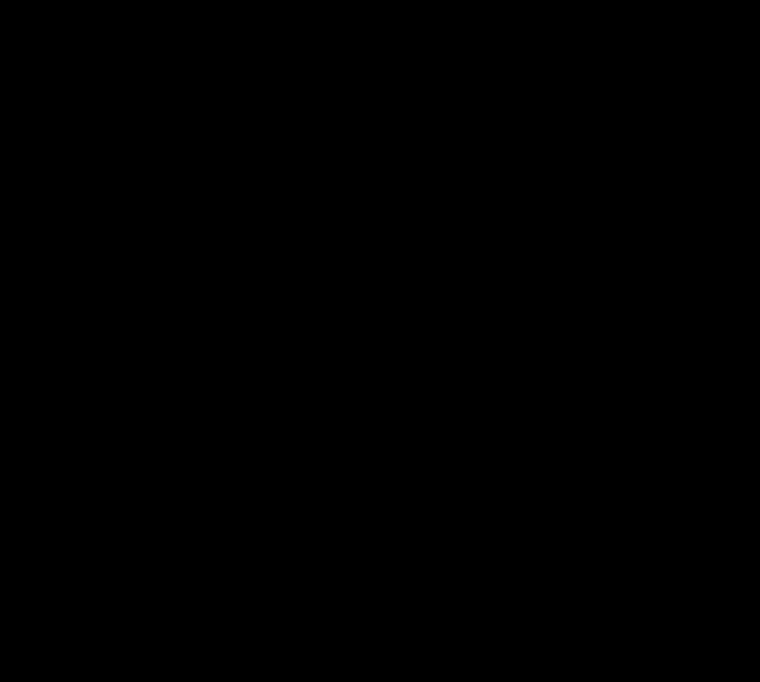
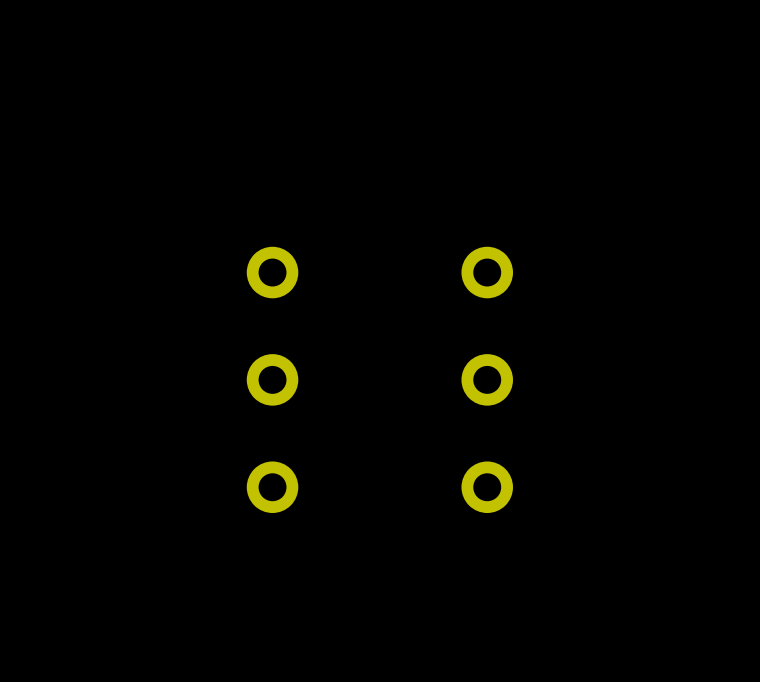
part: none -> (272, 379)
part: none -> (487, 379)

